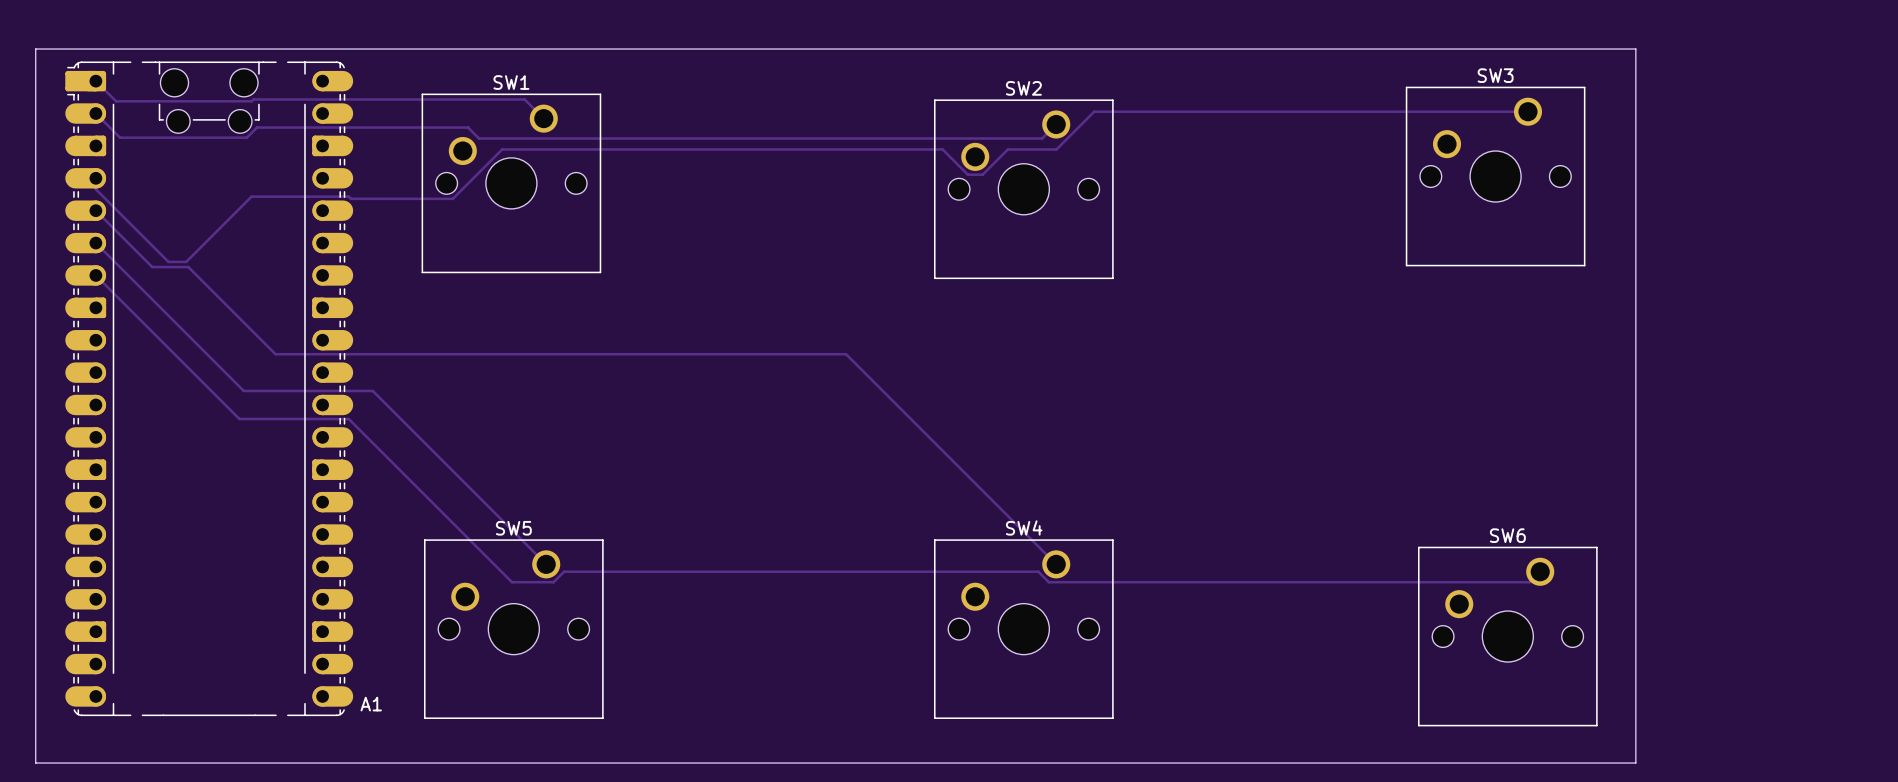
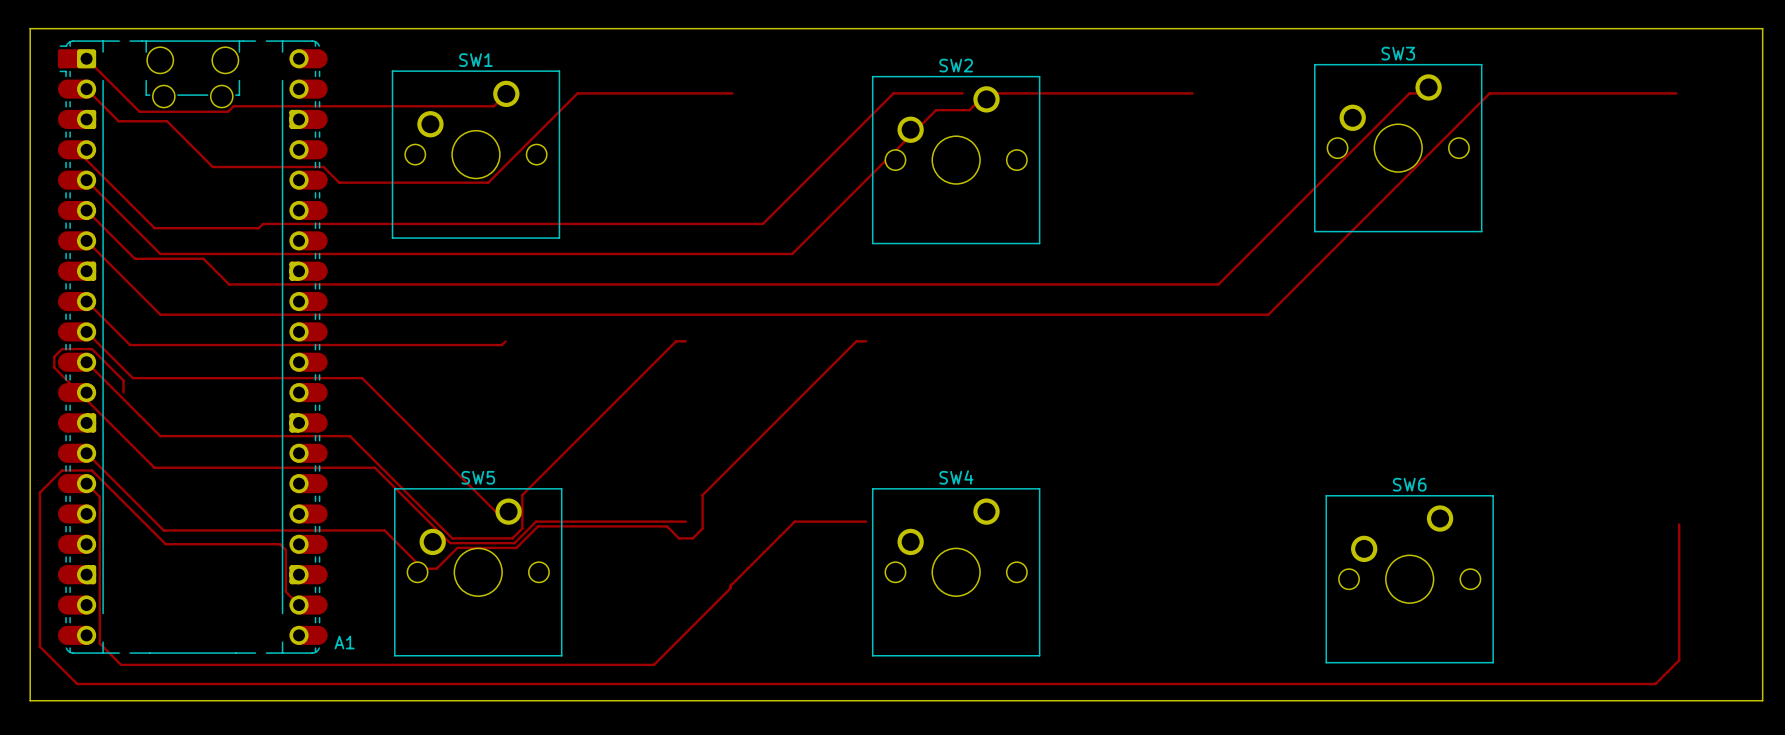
board edge: (1635, 49) (1635, 763) (35, 763) -> (1529, 28) (1762, 28) (1762, 700) (30, 700) (30, 697)
track: (116, 101) (524, 99) (543, 118) -> (233, 106) (493, 106) (506, 93)
track: (1527, 111) (1094, 111) (1056, 149) (1007, 149) (982, 174) (967, 174) (942, 149) (502, 149) (452, 198) (350, 198) -> (732, 93) (577, 93) (488, 182) (339, 182) (325, 169)
track: none -> (962, 93) (893, 93) (762, 223) (263, 223) (258, 228) (171, 228)
track: none -> (1192, 93) (986, 93) (969, 110) (936, 110) (792, 254) (160, 254) (139, 232)
track: (1056, 124) (1042, 138) (479, 138) (468, 127) (257, 127) (252, 131) -> none
track: (120, 137) (152, 137) -> (105, 77) (139, 111)
track: (251, 196) (186, 261) -> (232, 167) (212, 167) (167, 121) (118, 121) (109, 111)
track: (152, 267) (188, 267) (275, 354) -> (160, 314) (254, 314)
track: (147, 294) (243, 390) (372, 390) (546, 564) -> (134, 258) (203, 258) (229, 284) (1218, 284) (1409, 93) (1419, 93)
track: none -> (86, 301) (130, 345) (501, 345) (505, 341)
track: (174, 354) (239, 419) (348, 419) (512, 582) (553, 582) (564, 571) (1038, 571) (1048, 582) (1529, 582) (1540, 571) -> none
track: (846, 354) (1056, 564) -> (789, 314) (1268, 314) (1489, 93) (1676, 93)
track: none -> (86, 331) (132, 378) (362, 378) (505, 521)
track: none -> (685, 341) (676, 341) (522, 495) (522, 528) (512, 538) (452, 538) (350, 436) (160, 436) (86, 362)
track: none -> (866, 341) (856, 341) (702, 495) (702, 528) (692, 538) (678, 538) (667, 526) (538, 526) (516, 547) (457, 547) (436, 568) (422, 568) (384, 530) (163, 530) (86, 453)
track: none -> (123, 392) (123, 380) (92, 349) (62, 349) (54, 356) (54, 367) (154, 467) (374, 467) (450, 543) (514, 543) (536, 521) (685, 521)
track: none -> (86, 483) (99, 496) (99, 643) (121, 664) (653, 664) (794, 521) (866, 521)
track: none -> (1679, 524) (1679, 660) (1655, 684) (77, 684) (39, 646) (39, 492) (62, 470) (92, 470) (165, 544) (280, 544) (285, 549) (285, 591) (299, 605)

